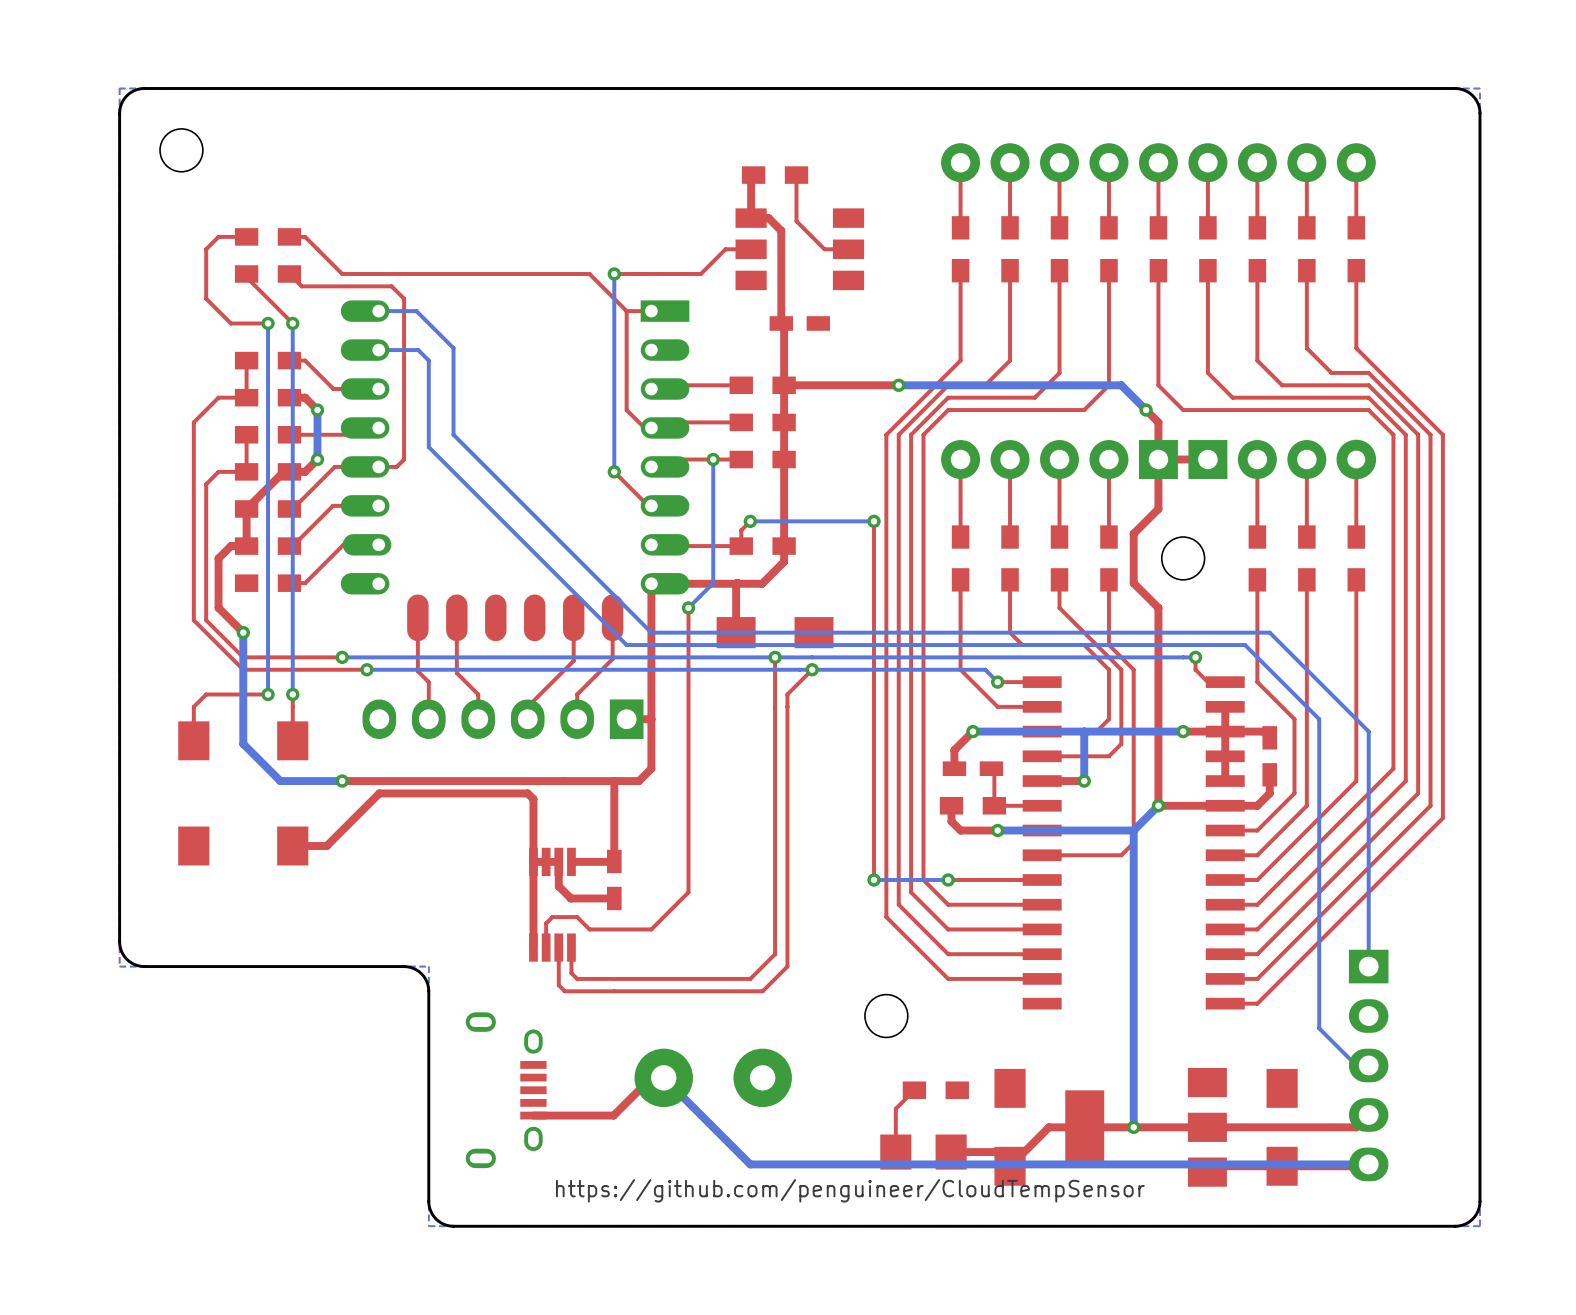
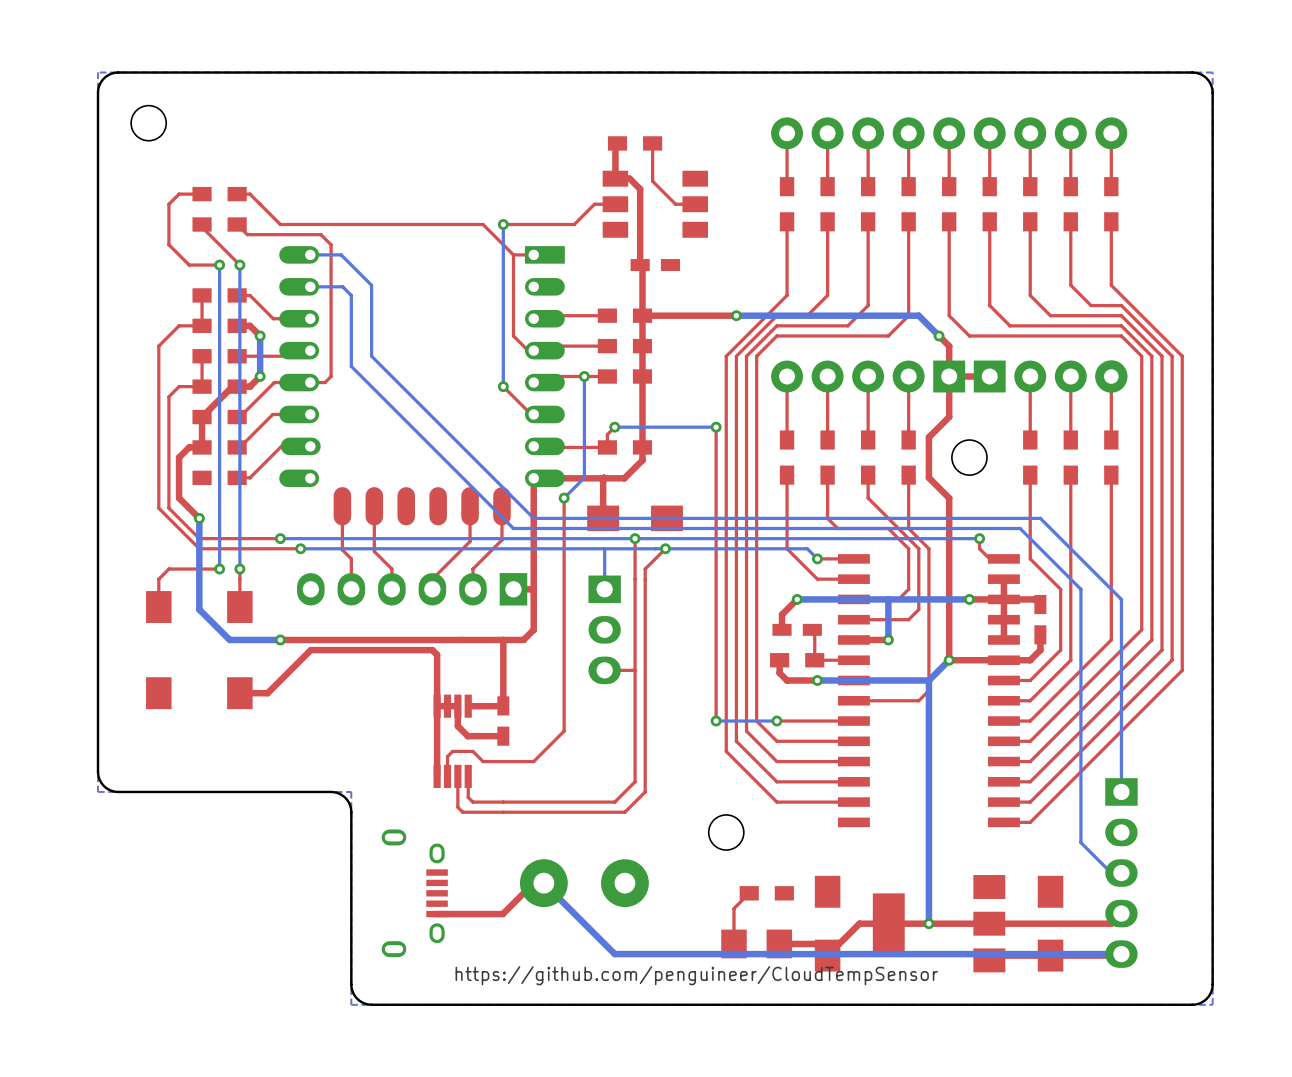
bottom track: none -> (604, 548) (604, 589)
part: none -> (604, 629)
top track: none -> (635, 670) (604, 670)

